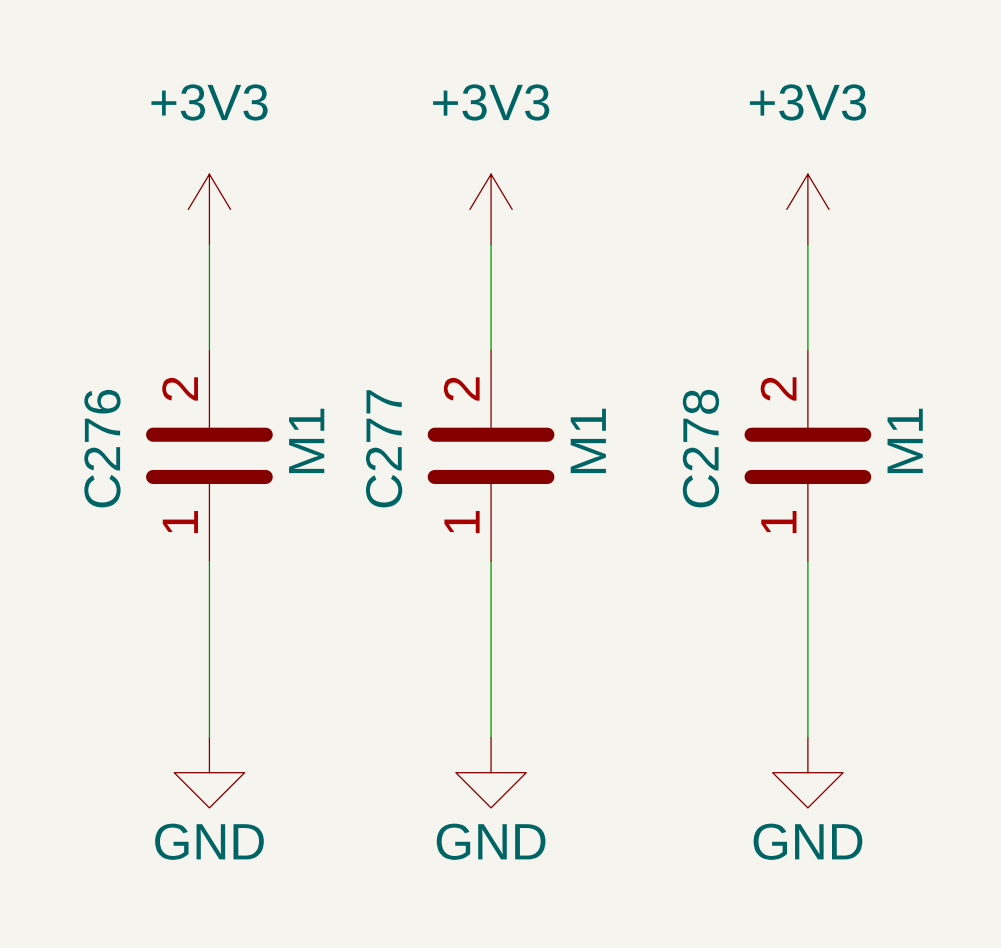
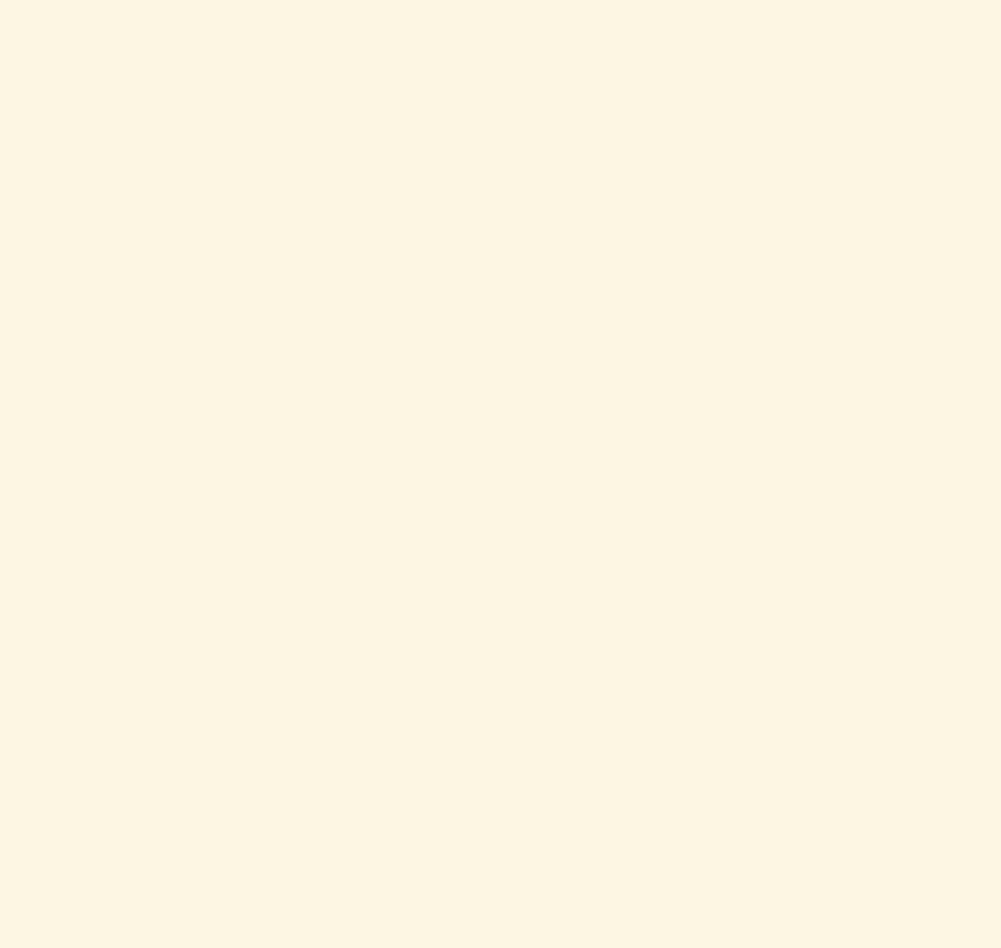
power symbol: +3V3 (209, 209) -> none
power symbol: +3V3 (491, 209) -> none
power symbol: +3V3 (807, 209) -> none
wire: (209, 244) (209, 350) -> none
wire: (491, 244) (491, 350) -> none
wire: (807, 244) (807, 350) -> none
C276: M1 (209, 455) -> none
C277: M1 (491, 455) -> none
C278: M1 (807, 455) -> none
wire: (209, 561) (209, 737) -> none
wire: (491, 561) (491, 737) -> none
wire: (807, 561) (807, 737) -> none
power symbol: GND (209, 772) -> none
power symbol: GND (491, 772) -> none
power symbol: GND (807, 772) -> none

